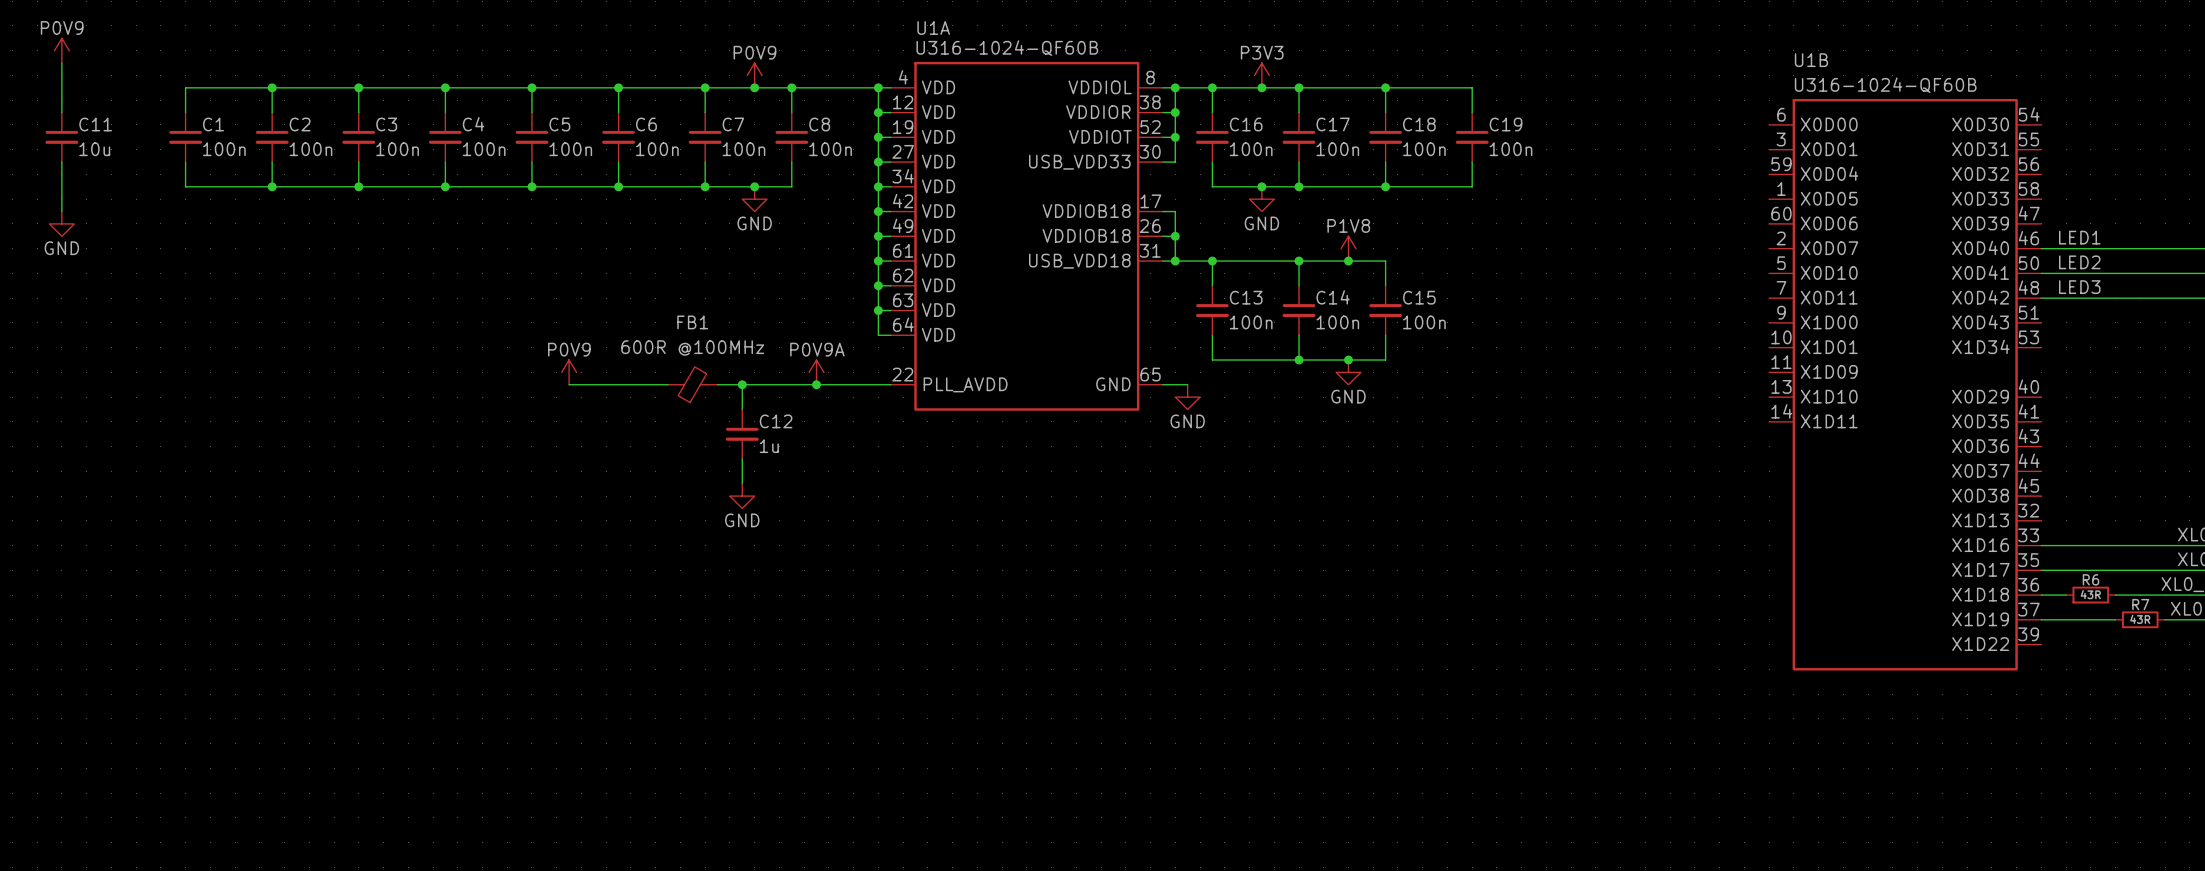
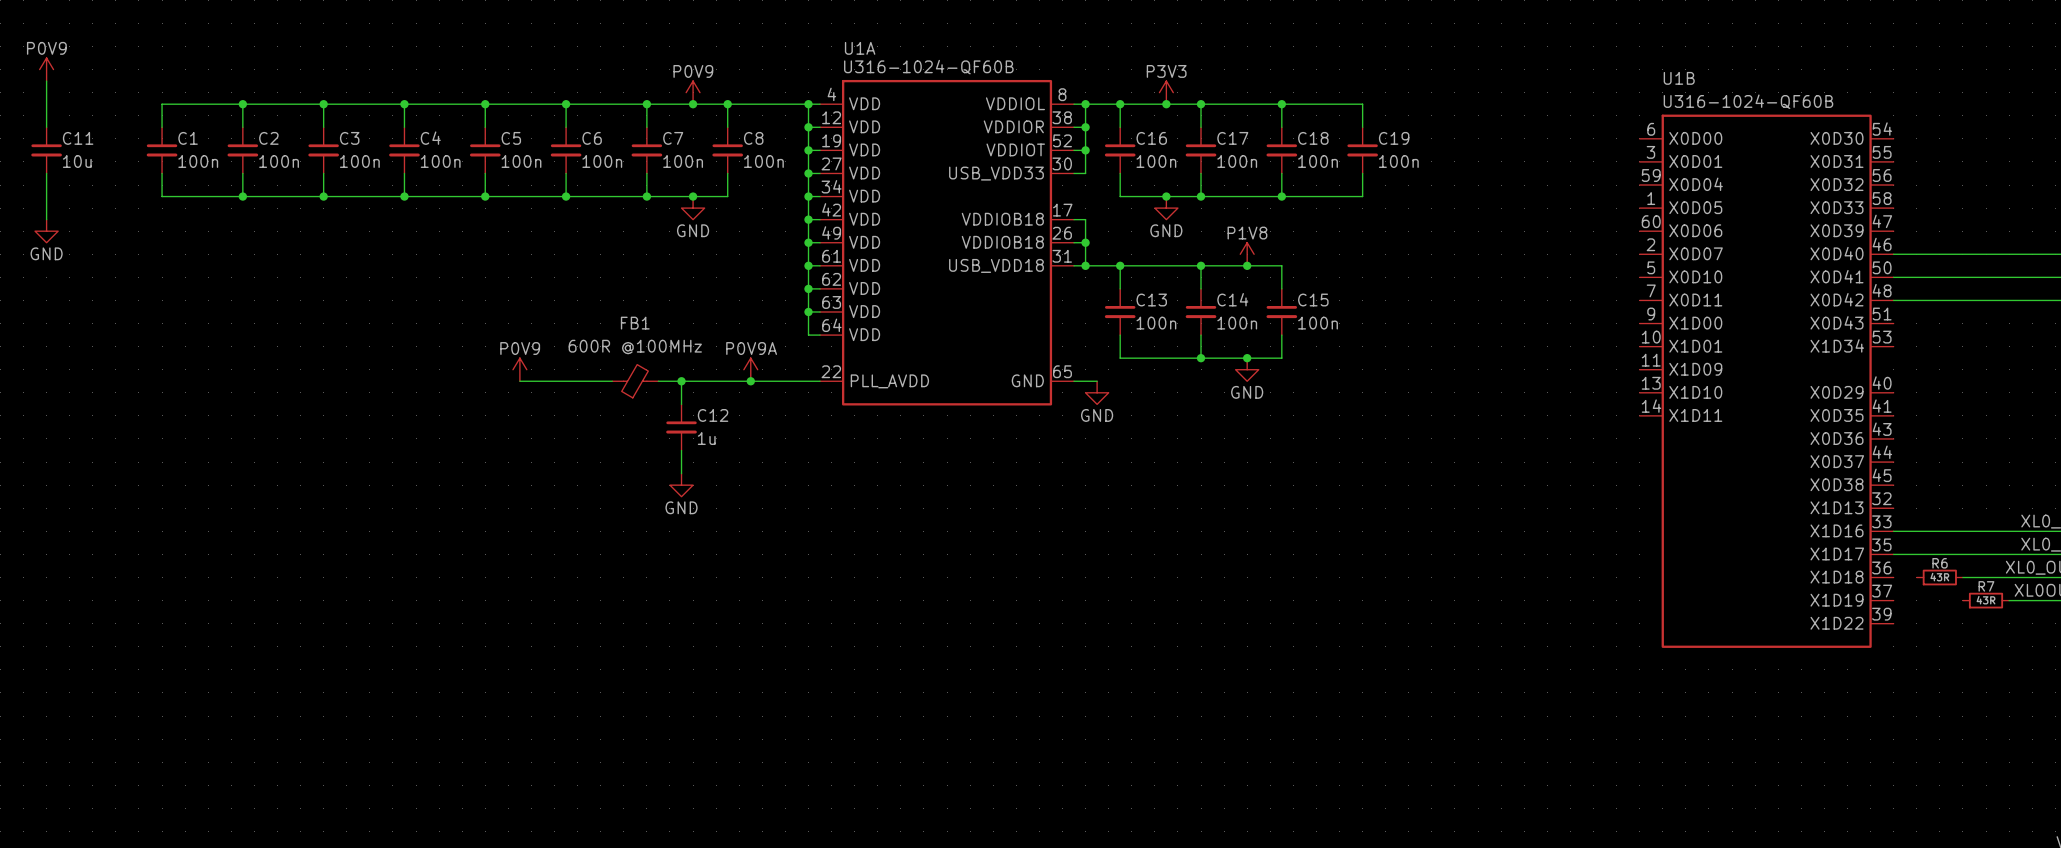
label: LED1 (2079, 237) -> none
label: LED2 (2079, 262) -> none
label: LED3 (2079, 287) -> none
wire: (2041, 595) (2066, 595) -> none
wire: (2041, 619) (2115, 619) -> none

